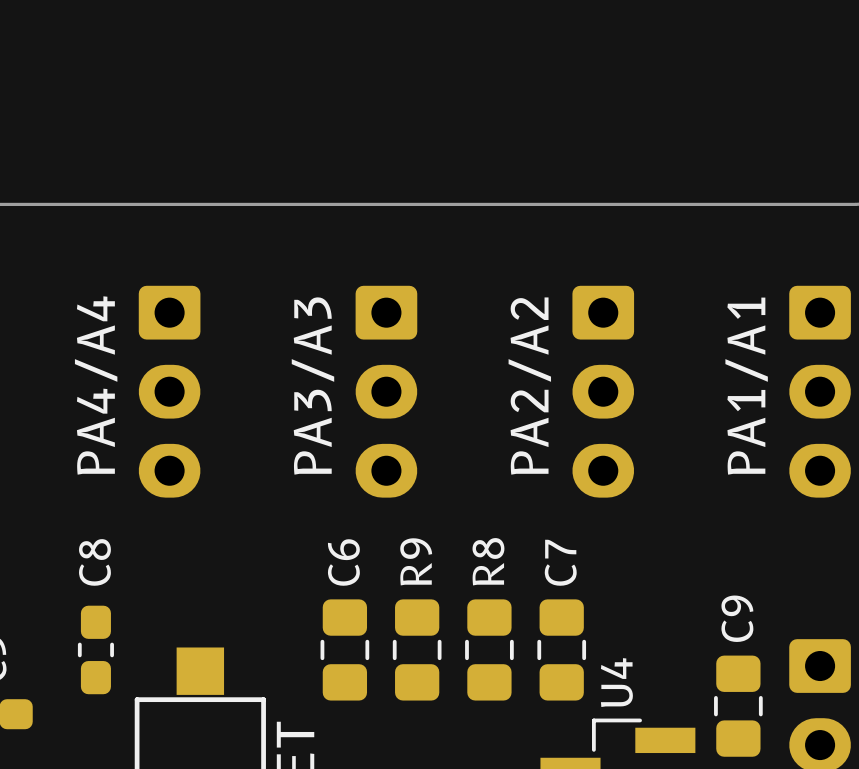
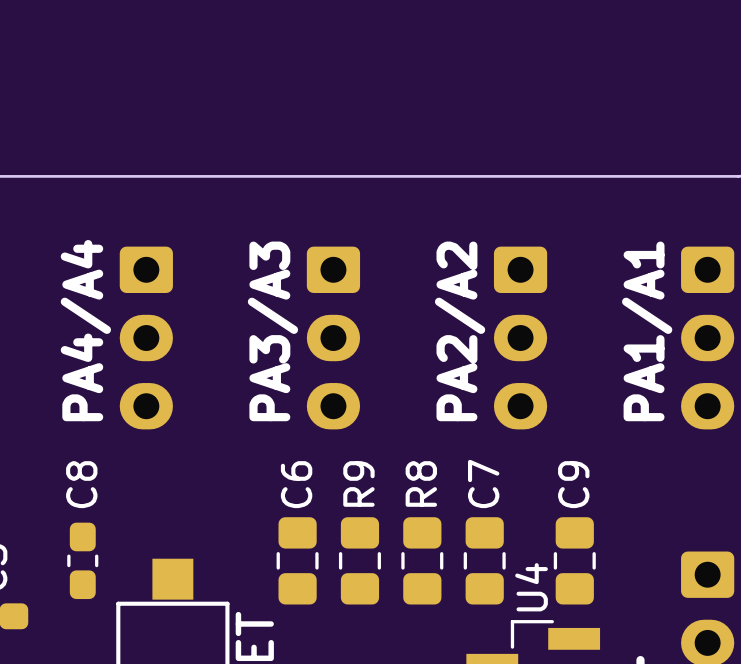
C9 position: (738, 706) -> (574, 560)

